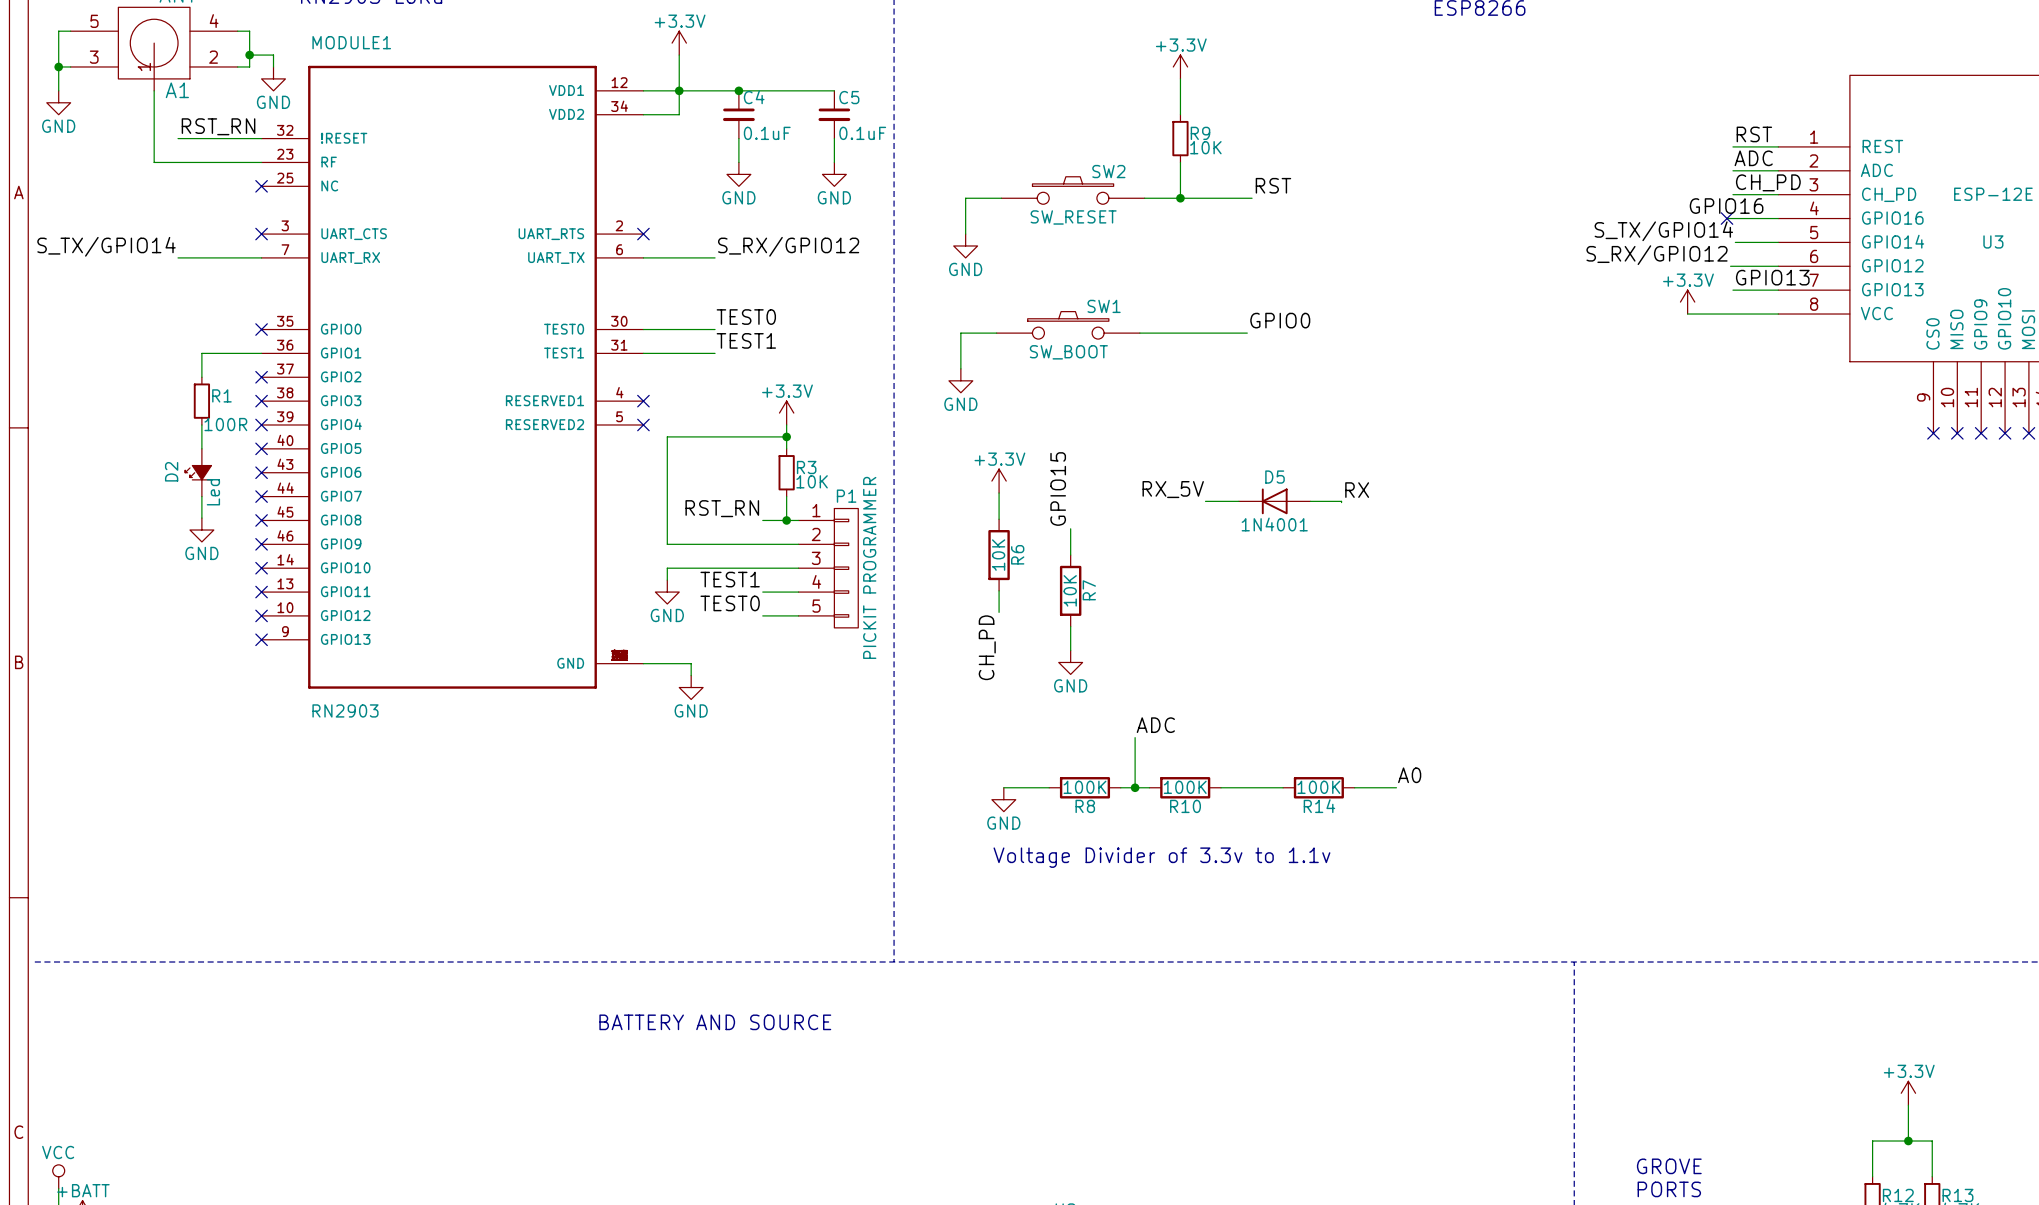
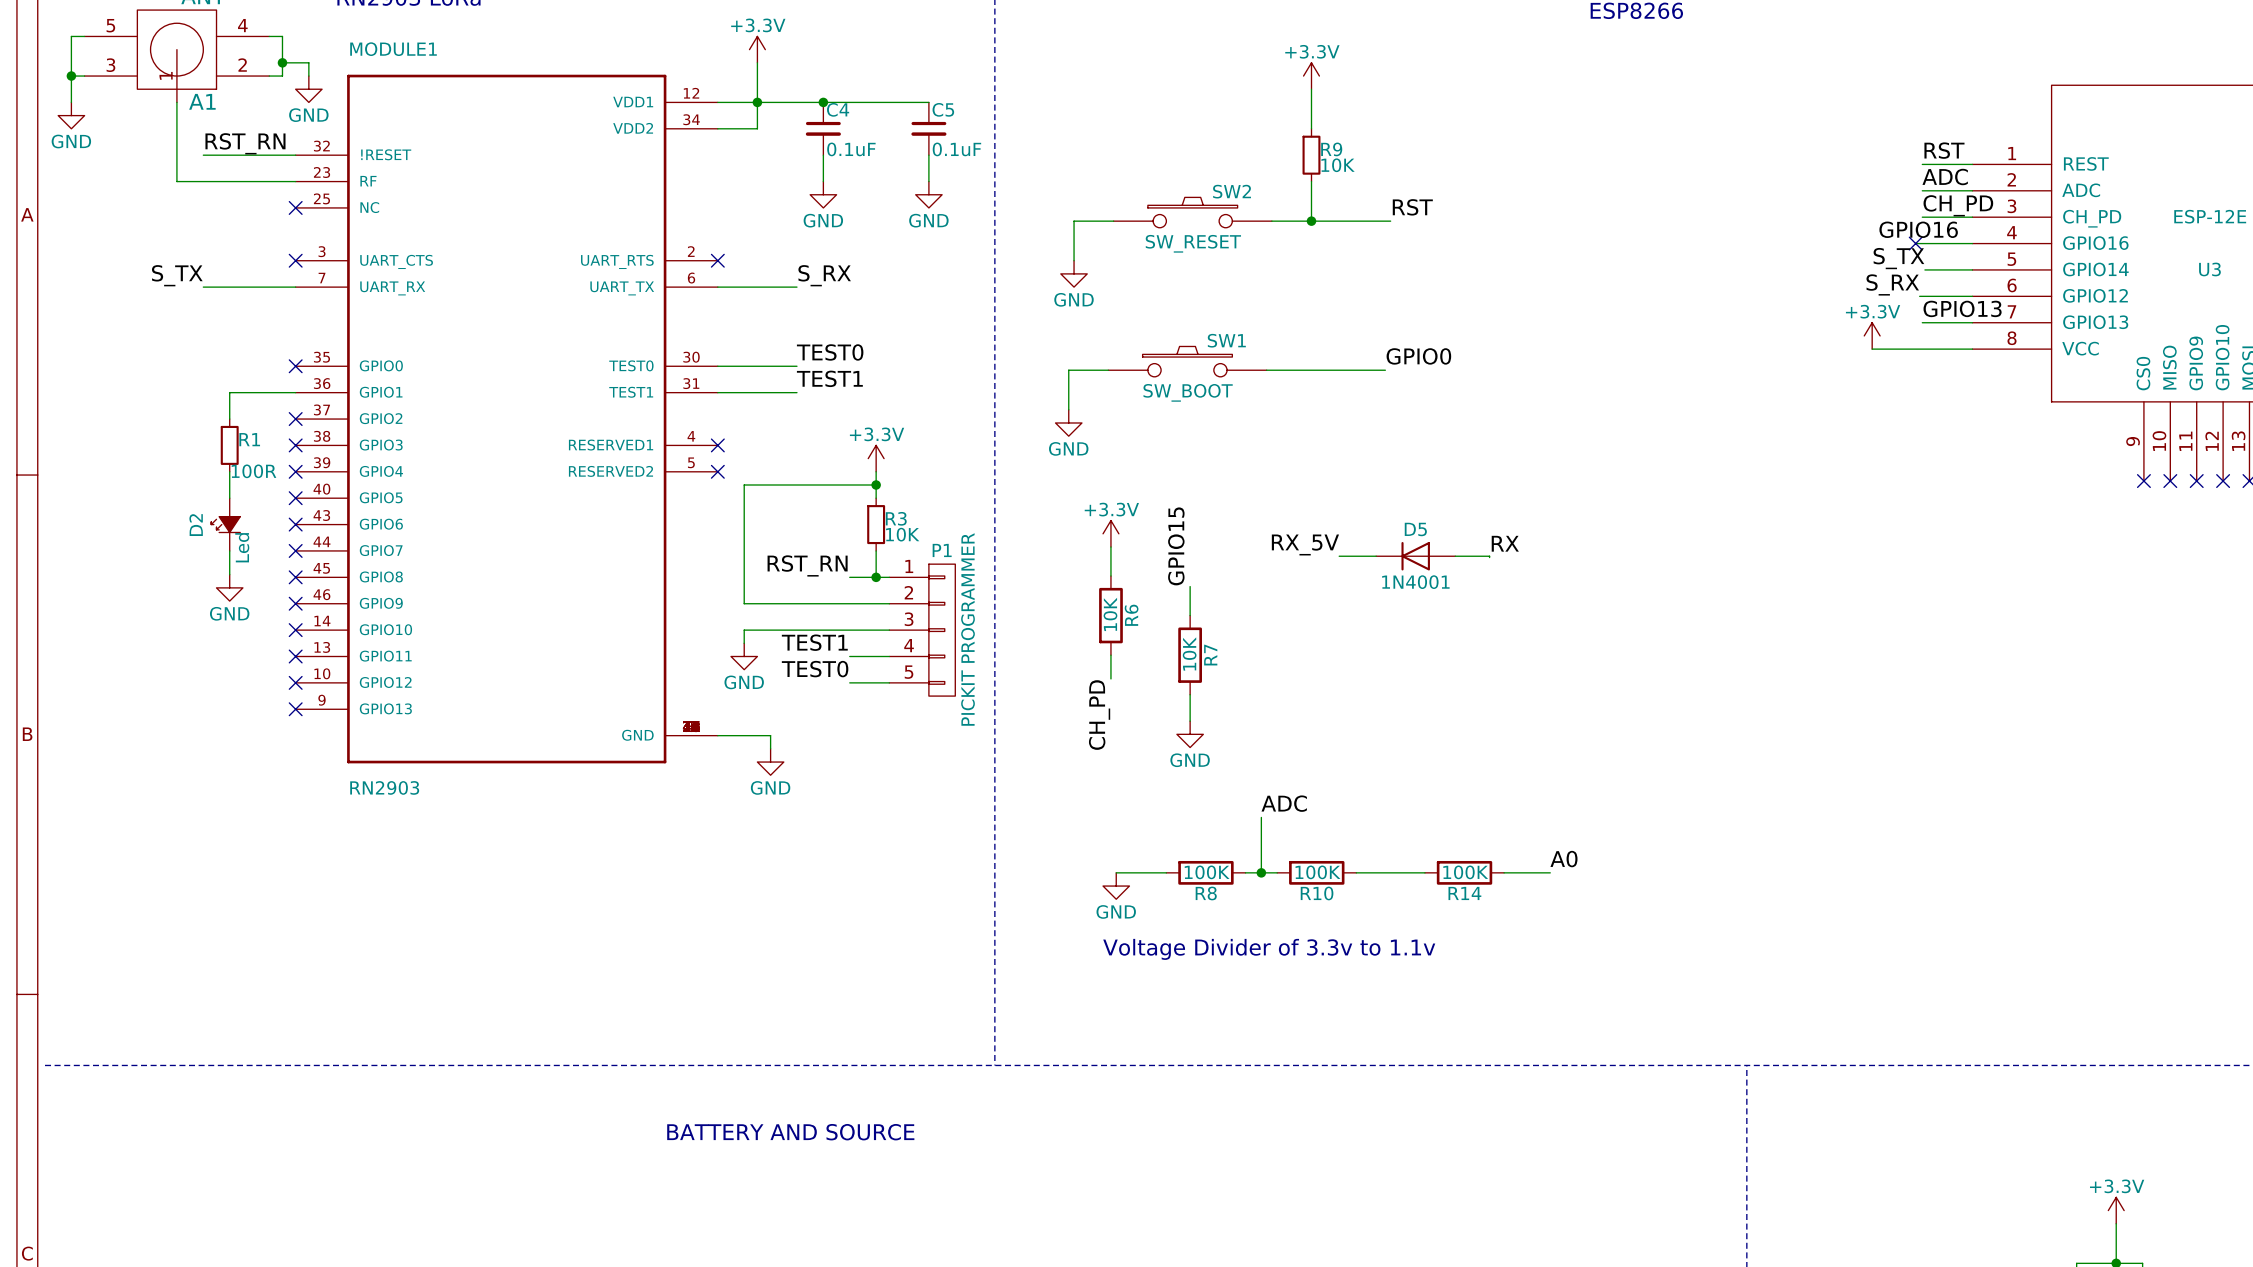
label: S_TX/GPIO14 (1663, 231) -> S_TX (1898, 258)
label: S_TX/GPIO14 (106, 246) -> S_TX (177, 275)
label: S_RX/GPIO12 (788, 246) -> S_RX (824, 275)
label: S_RX/GPIO12 (1657, 255) -> S_RX (1892, 284)

